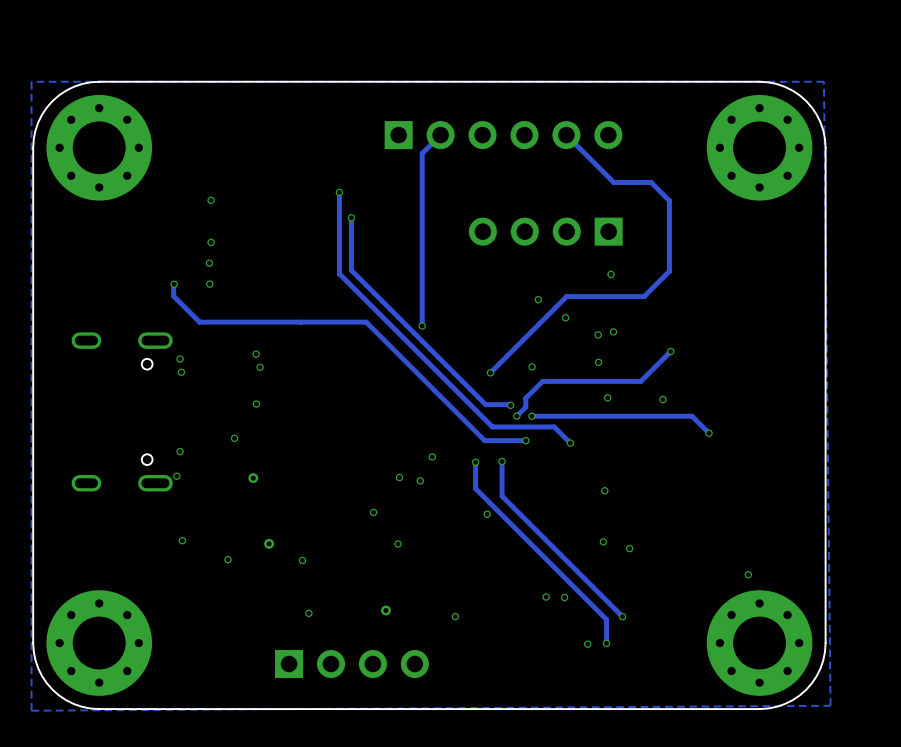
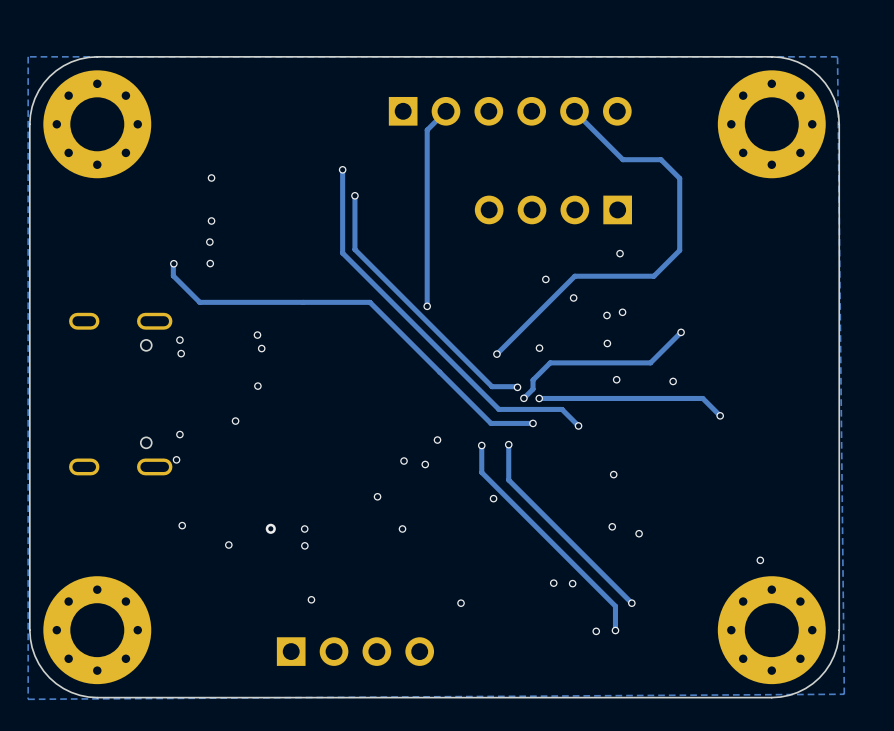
via: (253, 478) -> none
via: none -> (304, 528)
via: (385, 610) -> none

